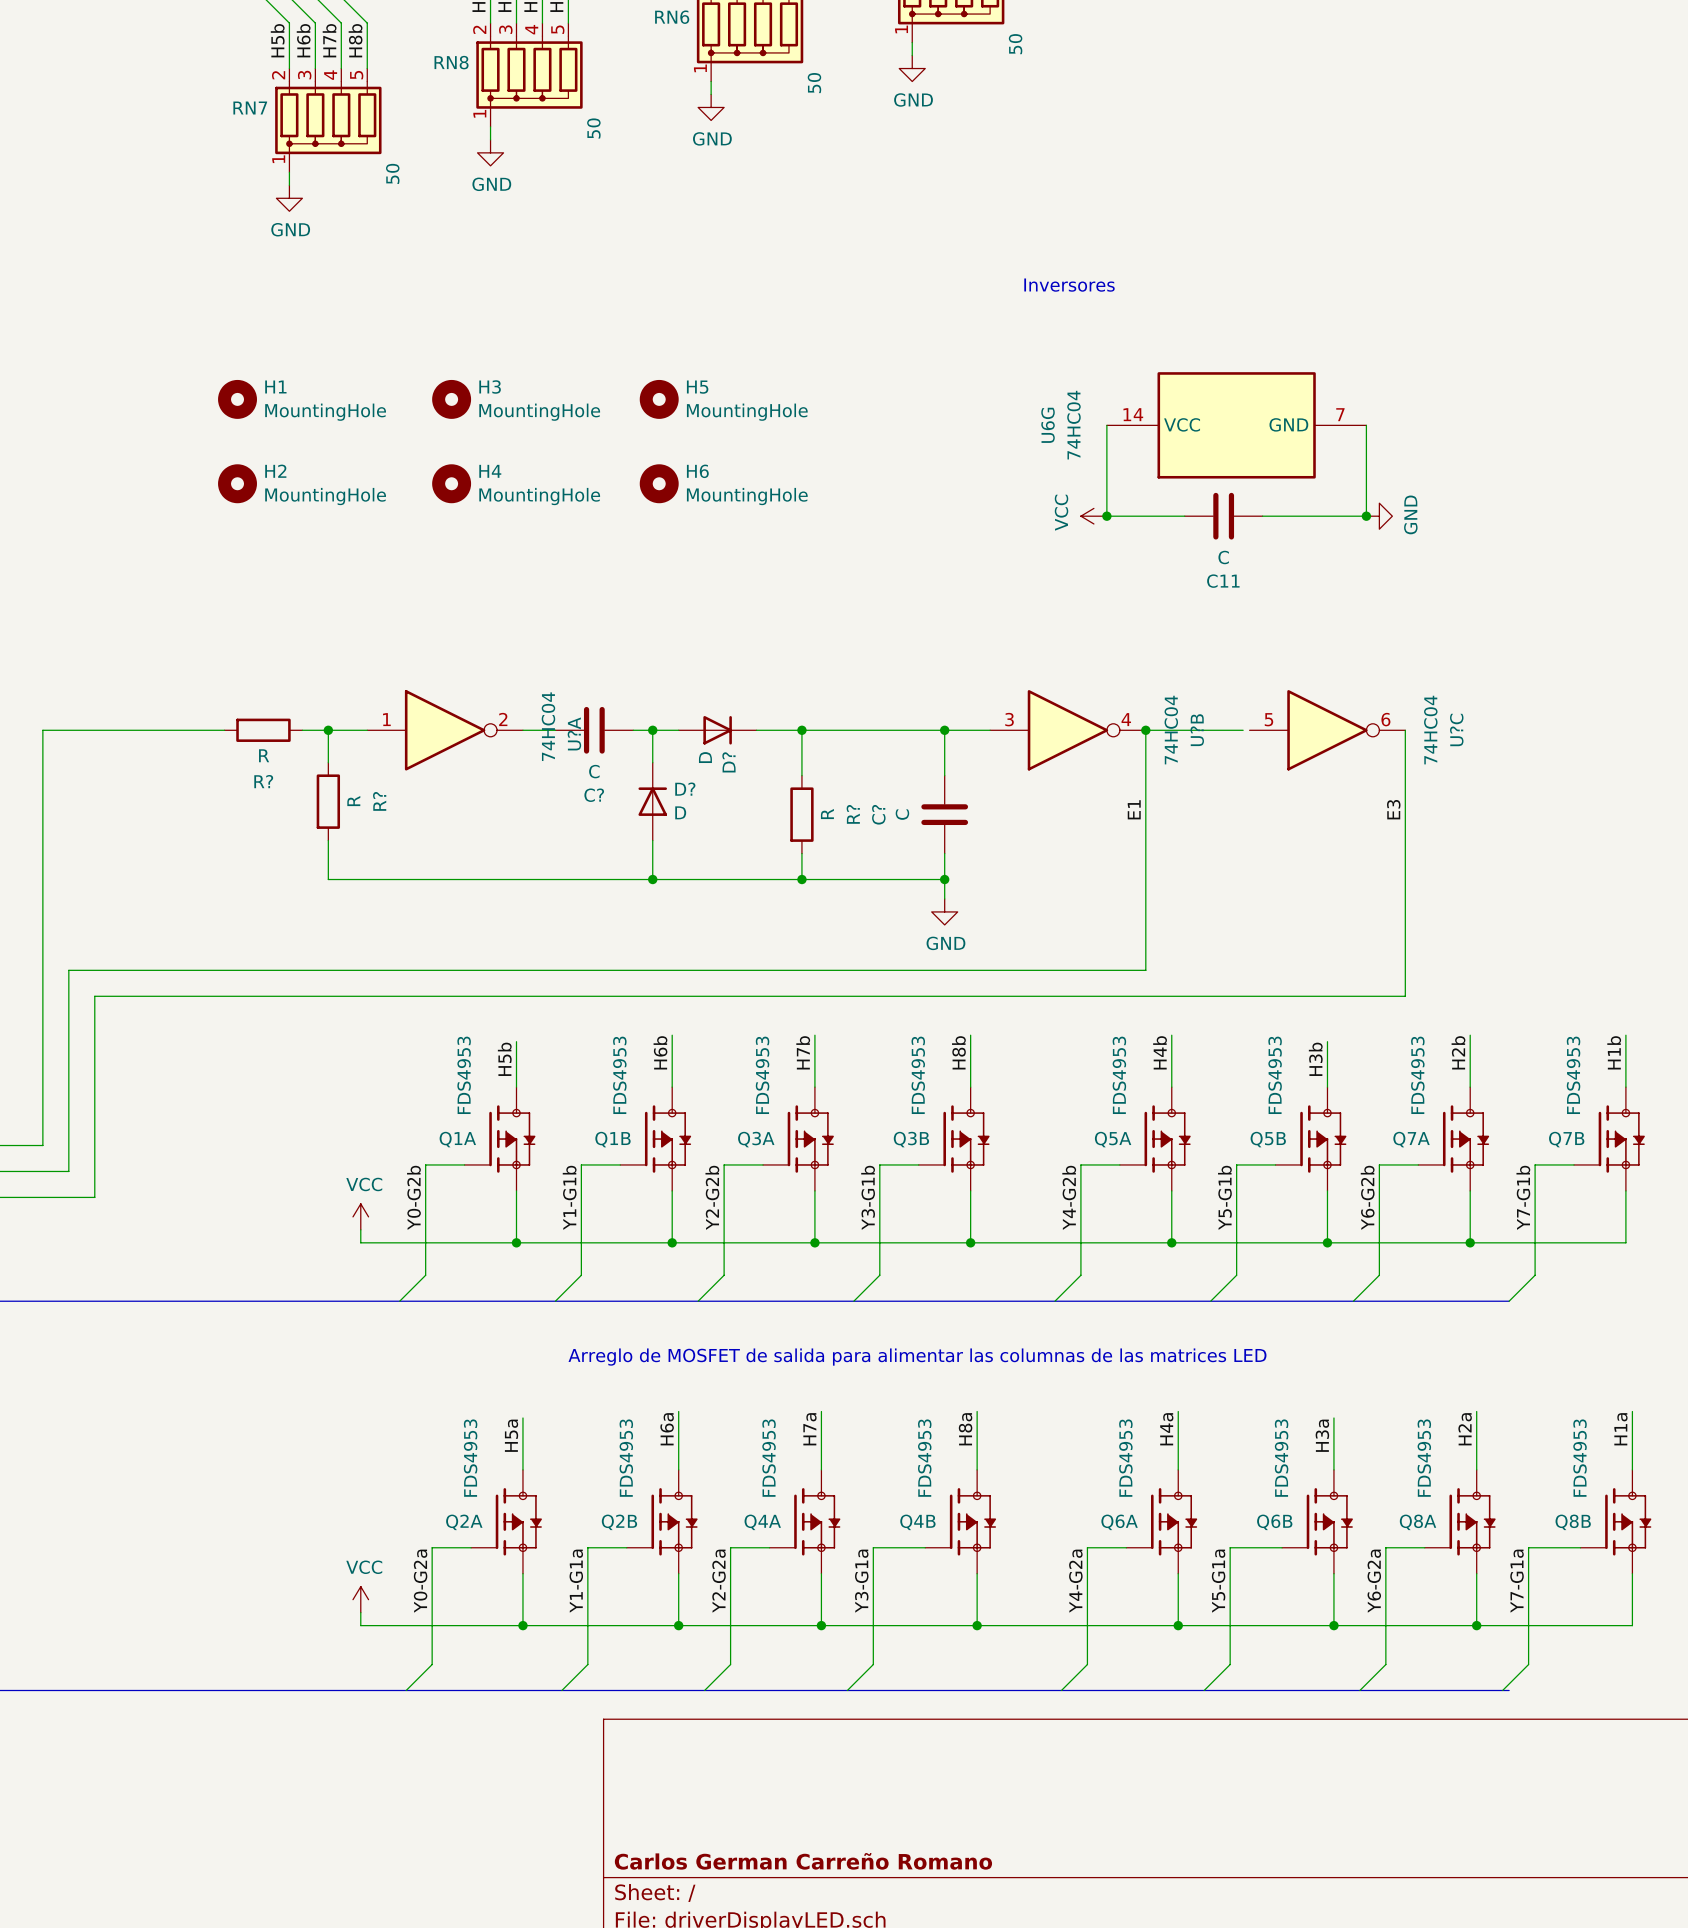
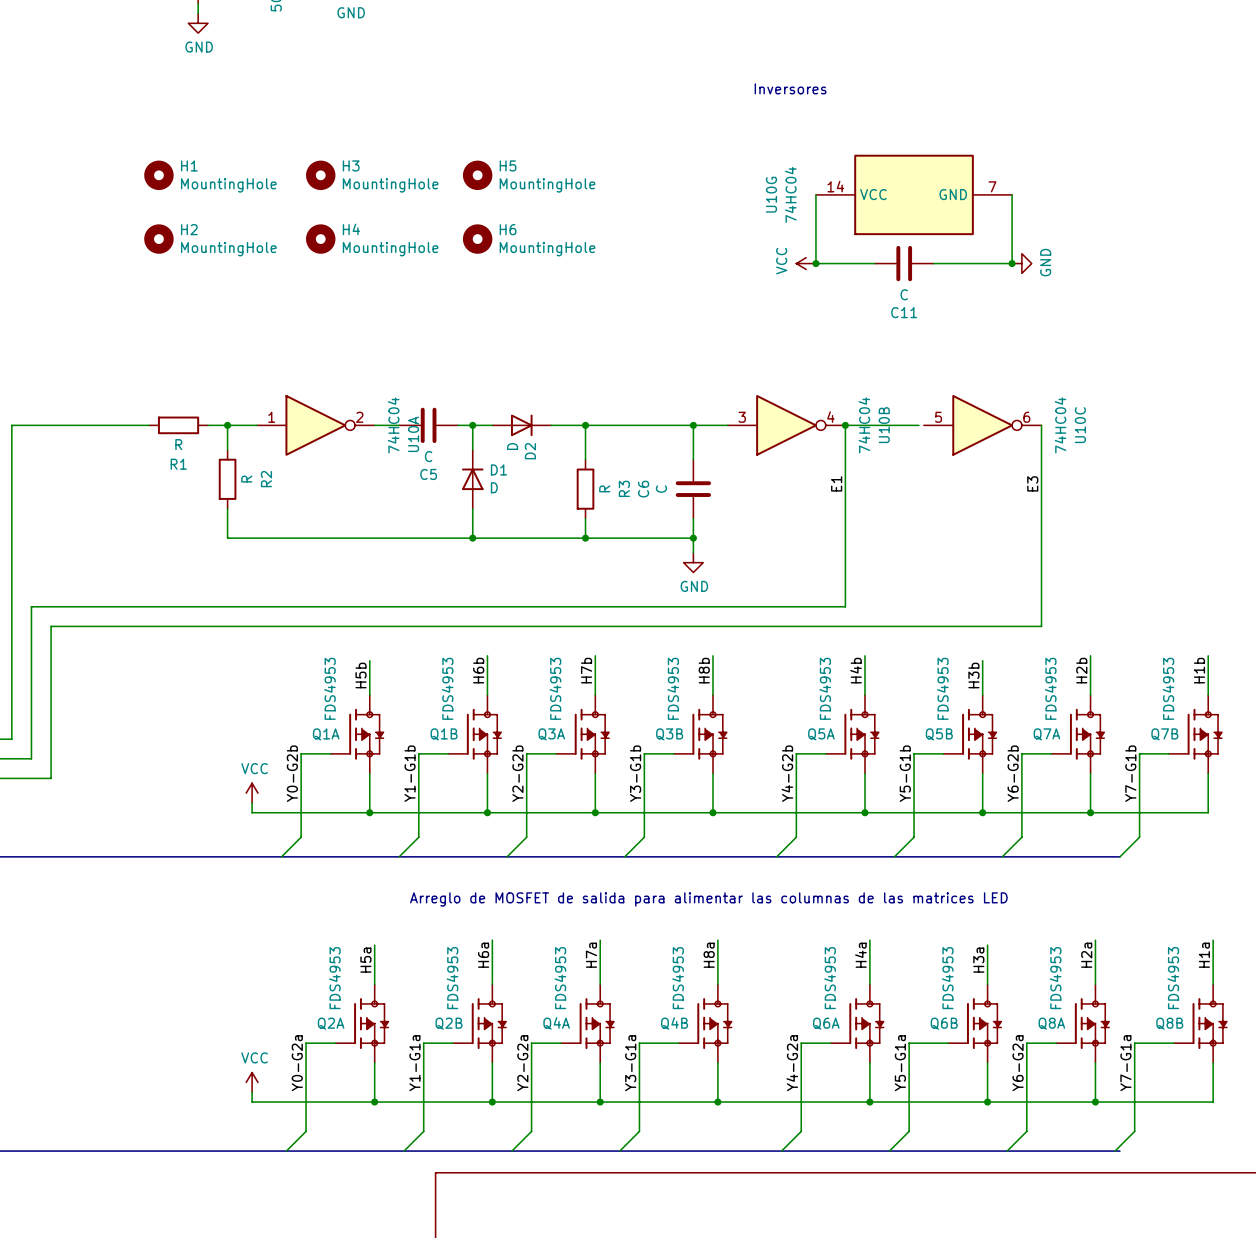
U6G name: U6G (1048, 425) -> U10G (771, 194)
U?B name: U?B (1197, 730) -> U10B (884, 425)
U?C name: U?C (1456, 730) -> U10C (1080, 425)
U?A name: U?A (574, 733) -> U10A (413, 434)
D? name: D? (728, 762) -> D2 (530, 451)
R? name: R? (263, 781) -> R1 (178, 464)
D? name: D? (685, 789) -> D1 (499, 469)
C? name: C? (594, 795) -> C5 (428, 474)
R? name: R? (379, 801) -> R2 (266, 479)
R? name: R? (853, 814) -> R3 (624, 488)
C? name: C? (878, 814) -> C6 (643, 489)

